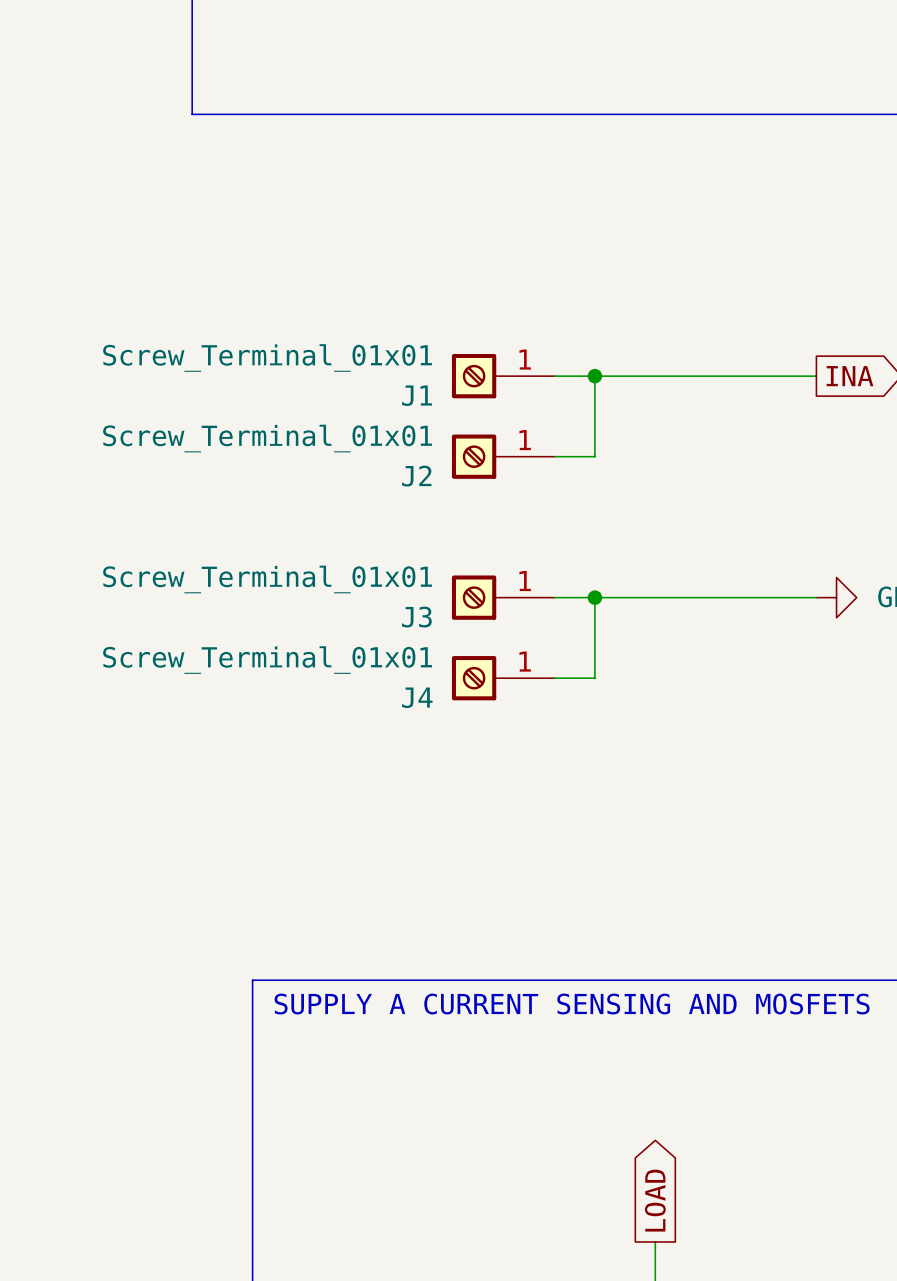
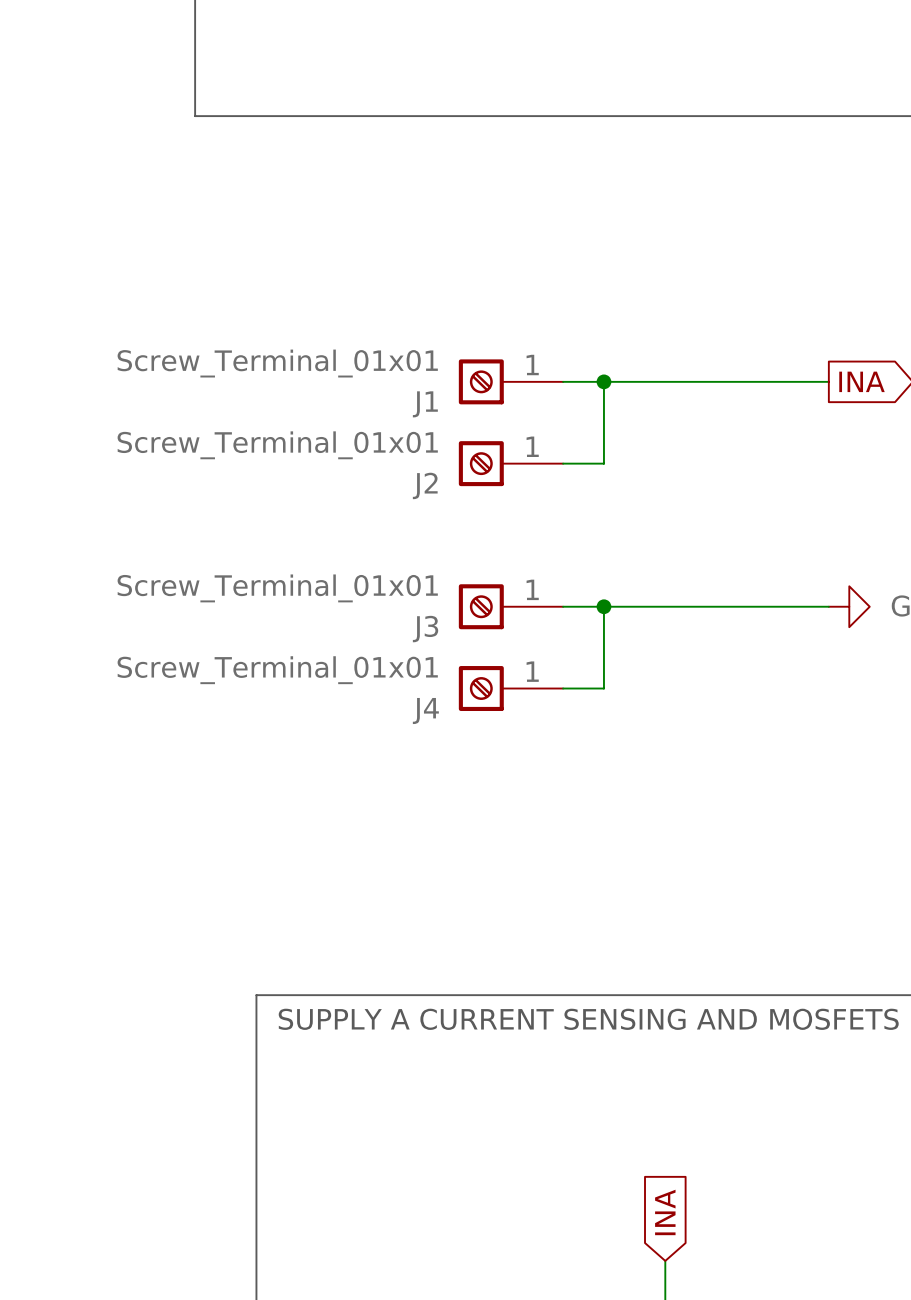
global label shape: output (655, 1200) -> input (665, 1212)
global label: LOAD (655, 1200) -> INA (665, 1212)

